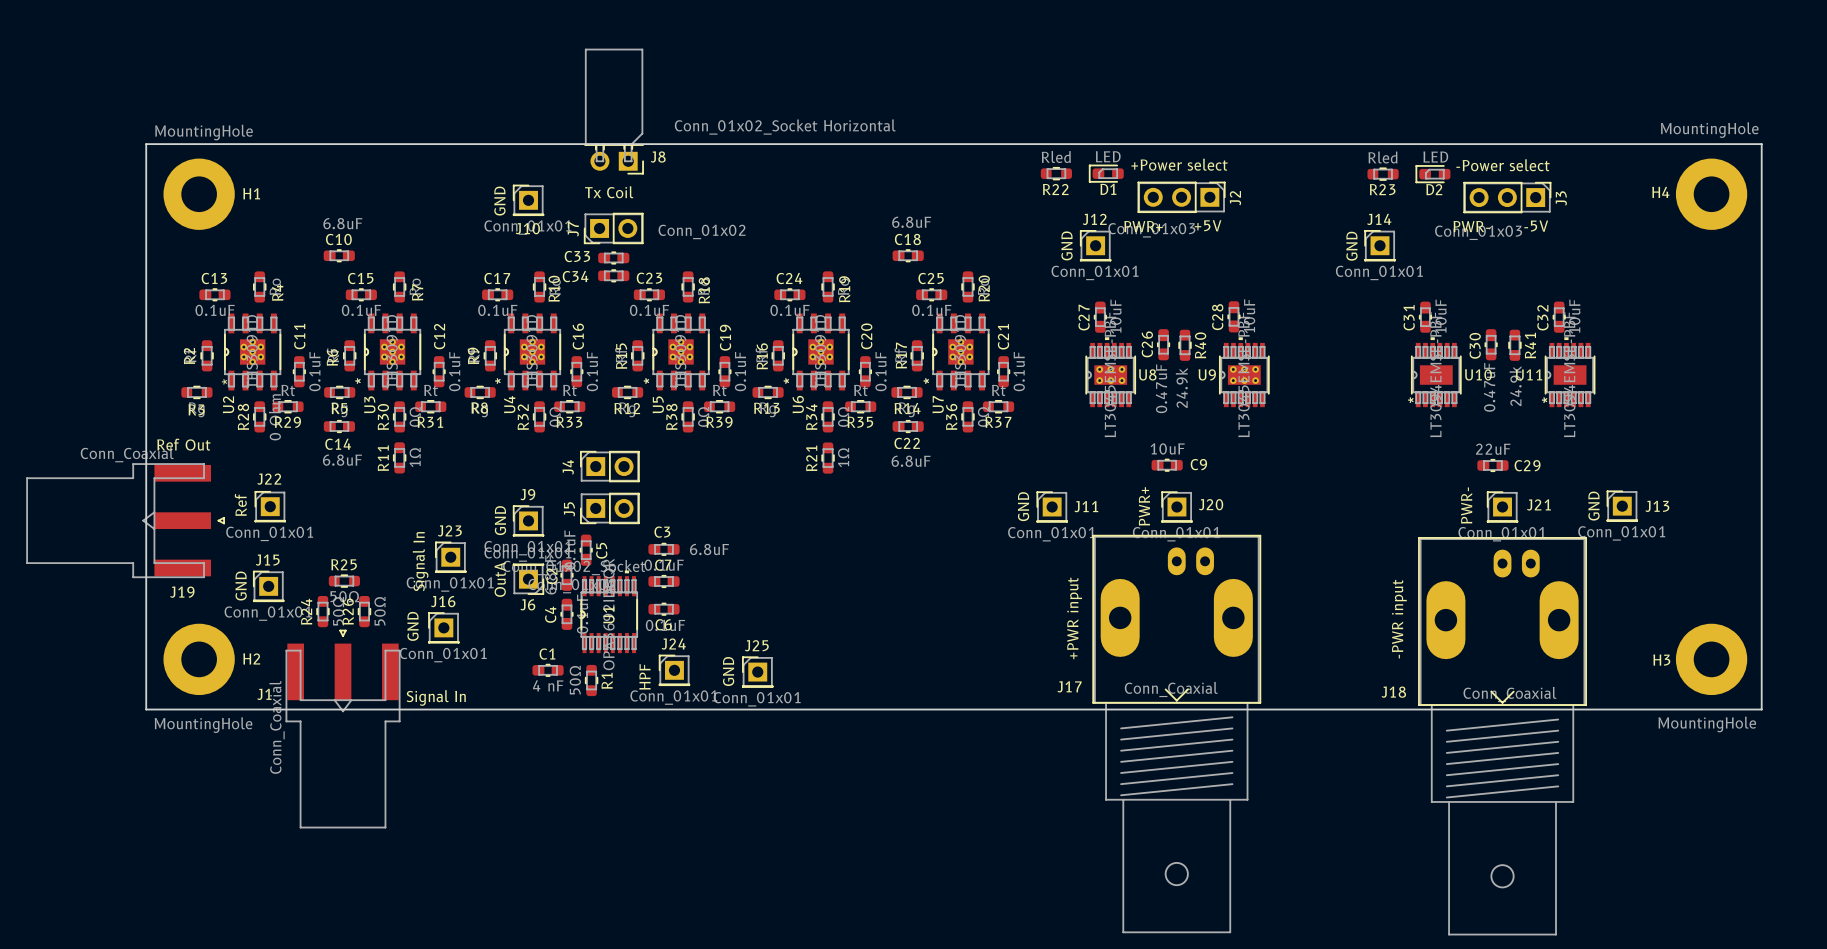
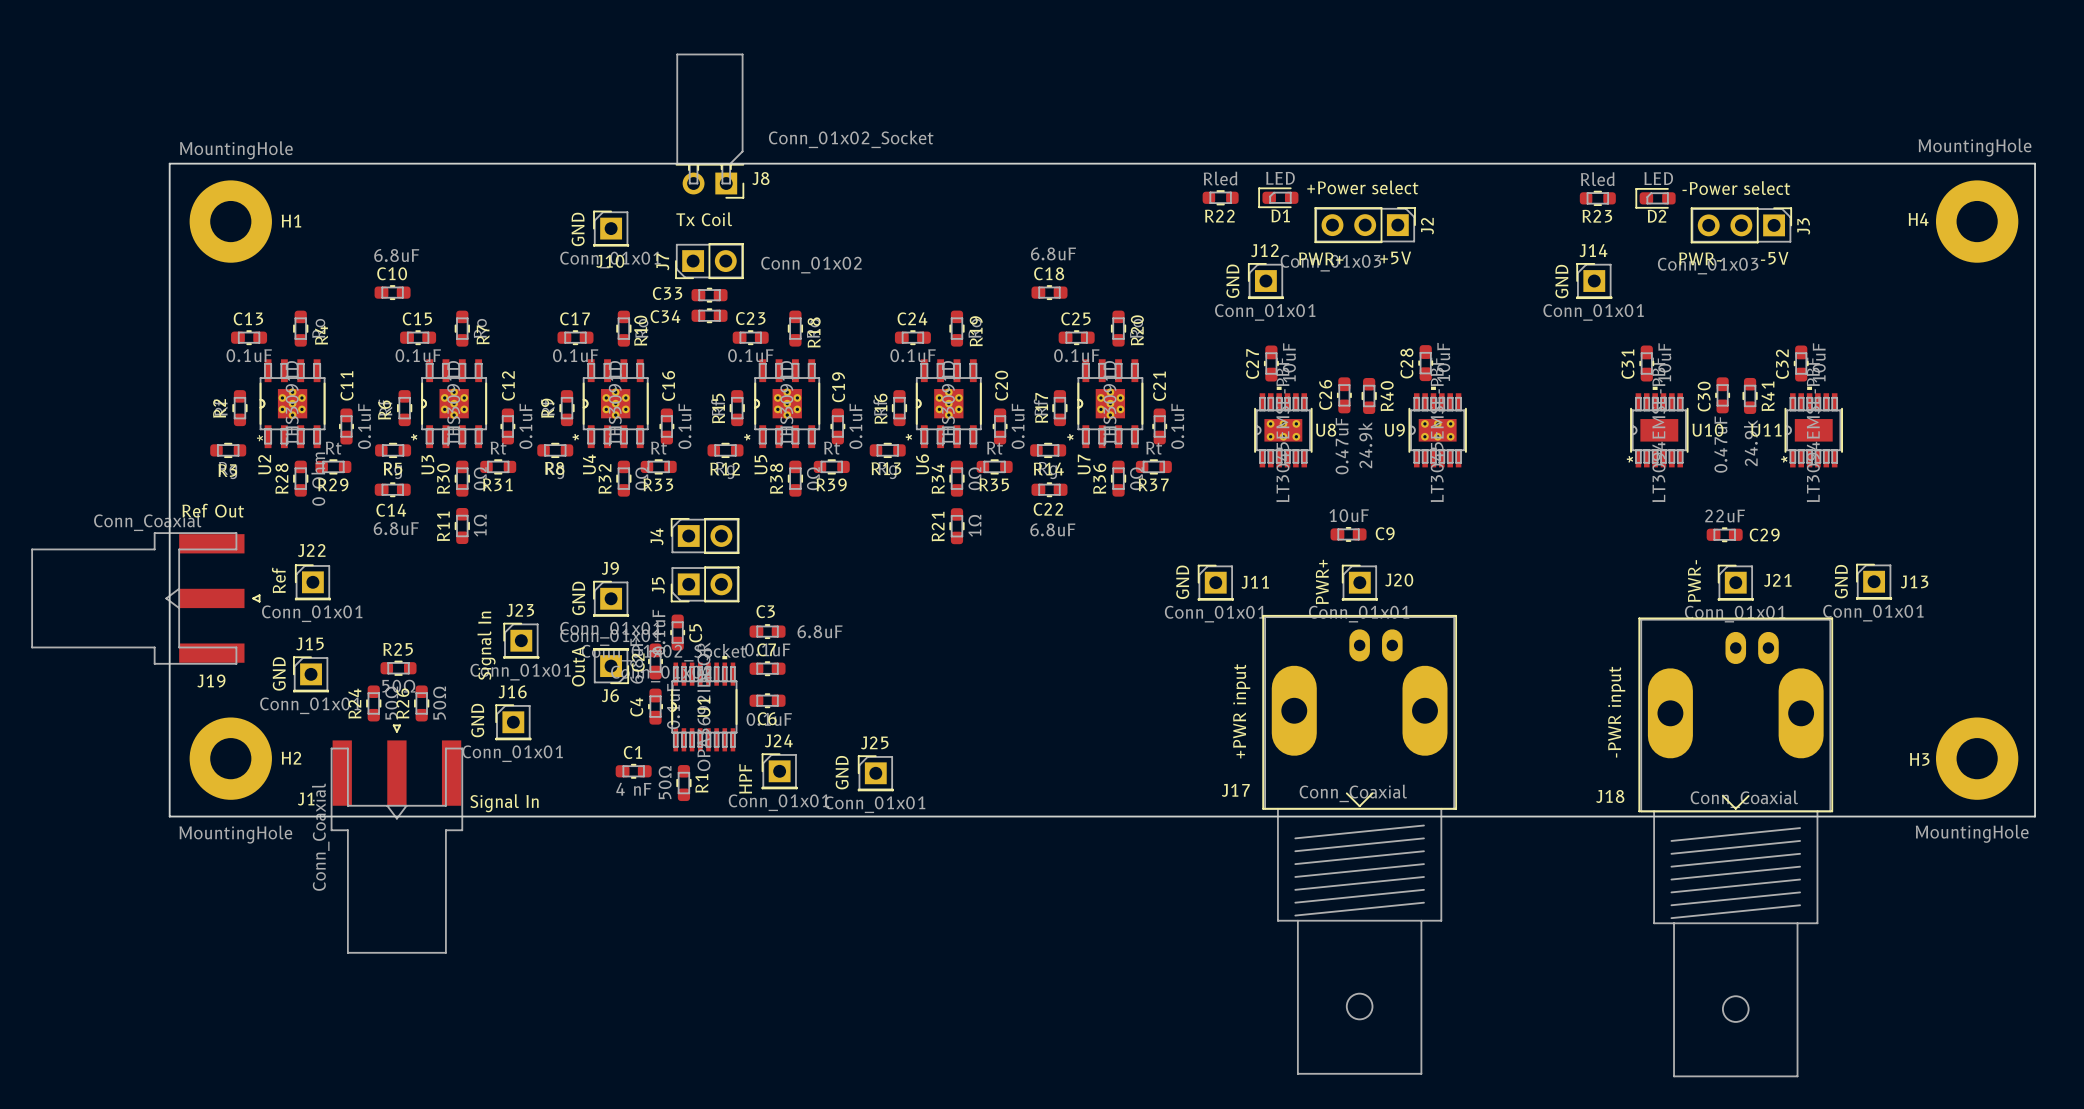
J8 value: Conn_01x02_Socket Horizontal (785, 127) -> Conn_01x02_Socket (851, 139)

